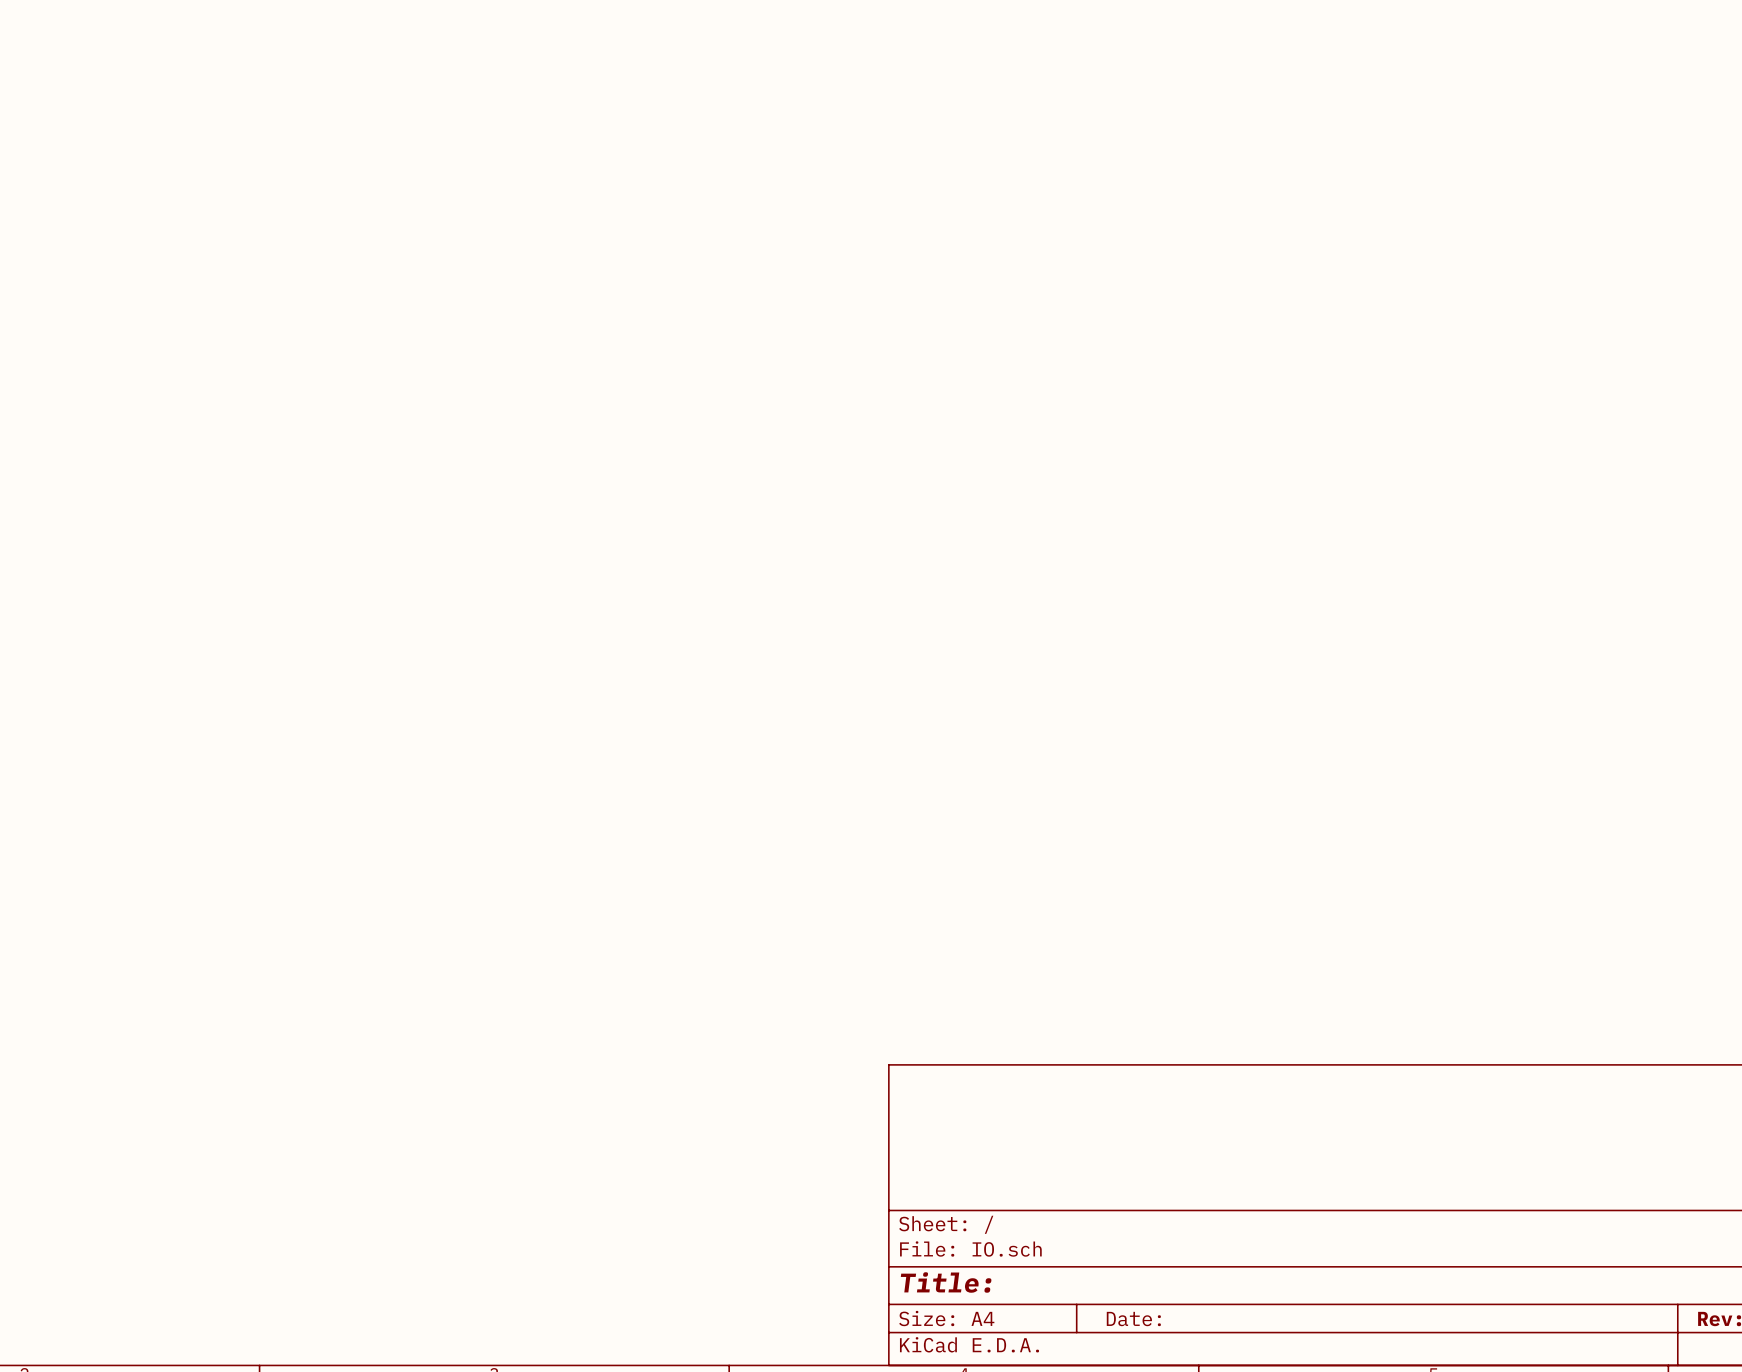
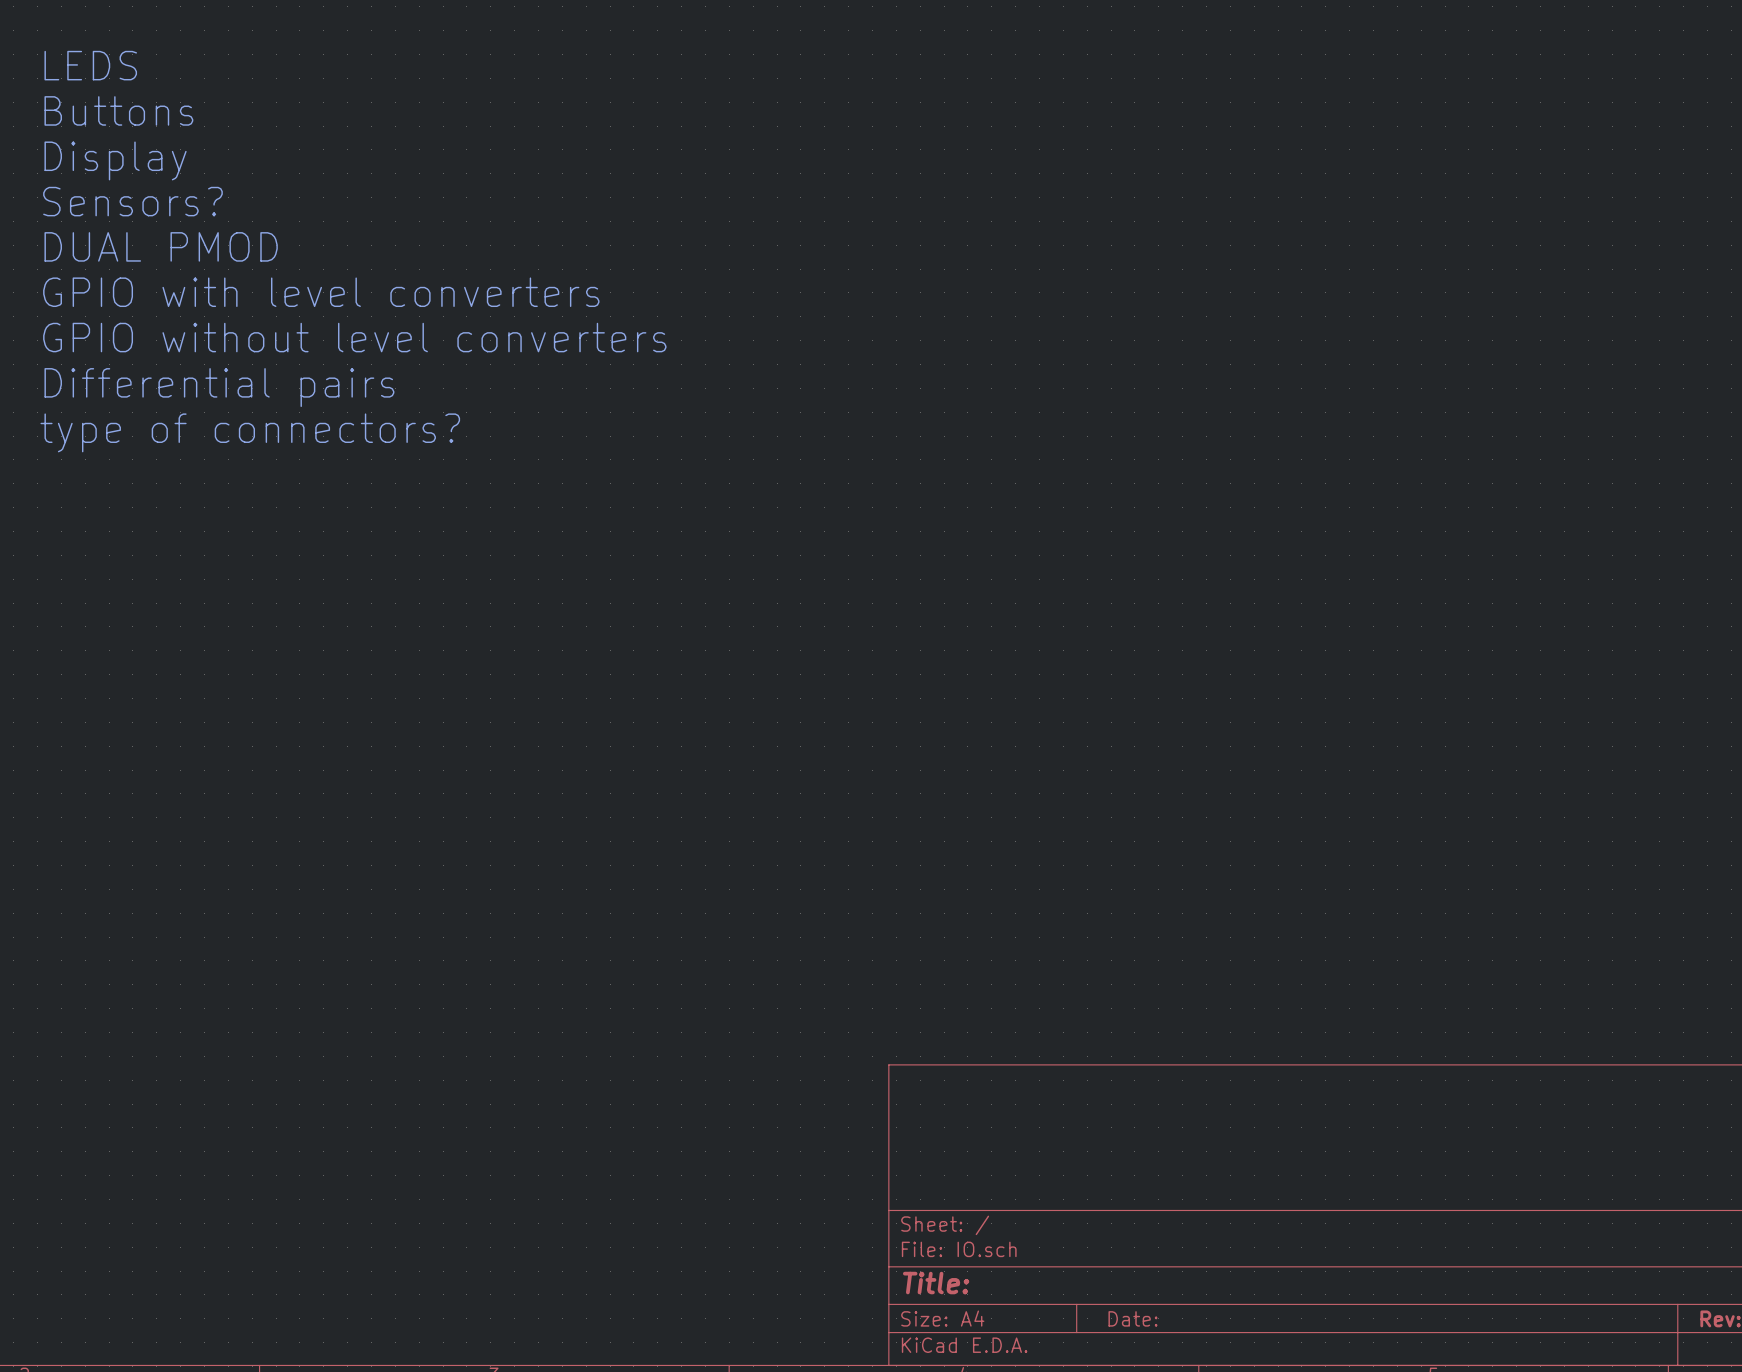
text: none -> LEDS (90, 65)
text: none -> Buttons (118, 110)
text: none -> Display (115, 160)
text: none -> Sensors? (132, 201)
text: none -> DUAL PMOD (161, 246)
text: none -> GPIO with level converters (321, 292)
text: none -> GPIO without level converters (354, 337)
text: none -> Differential pairs (219, 387)
text: none -> type of connectors? (250, 432)

